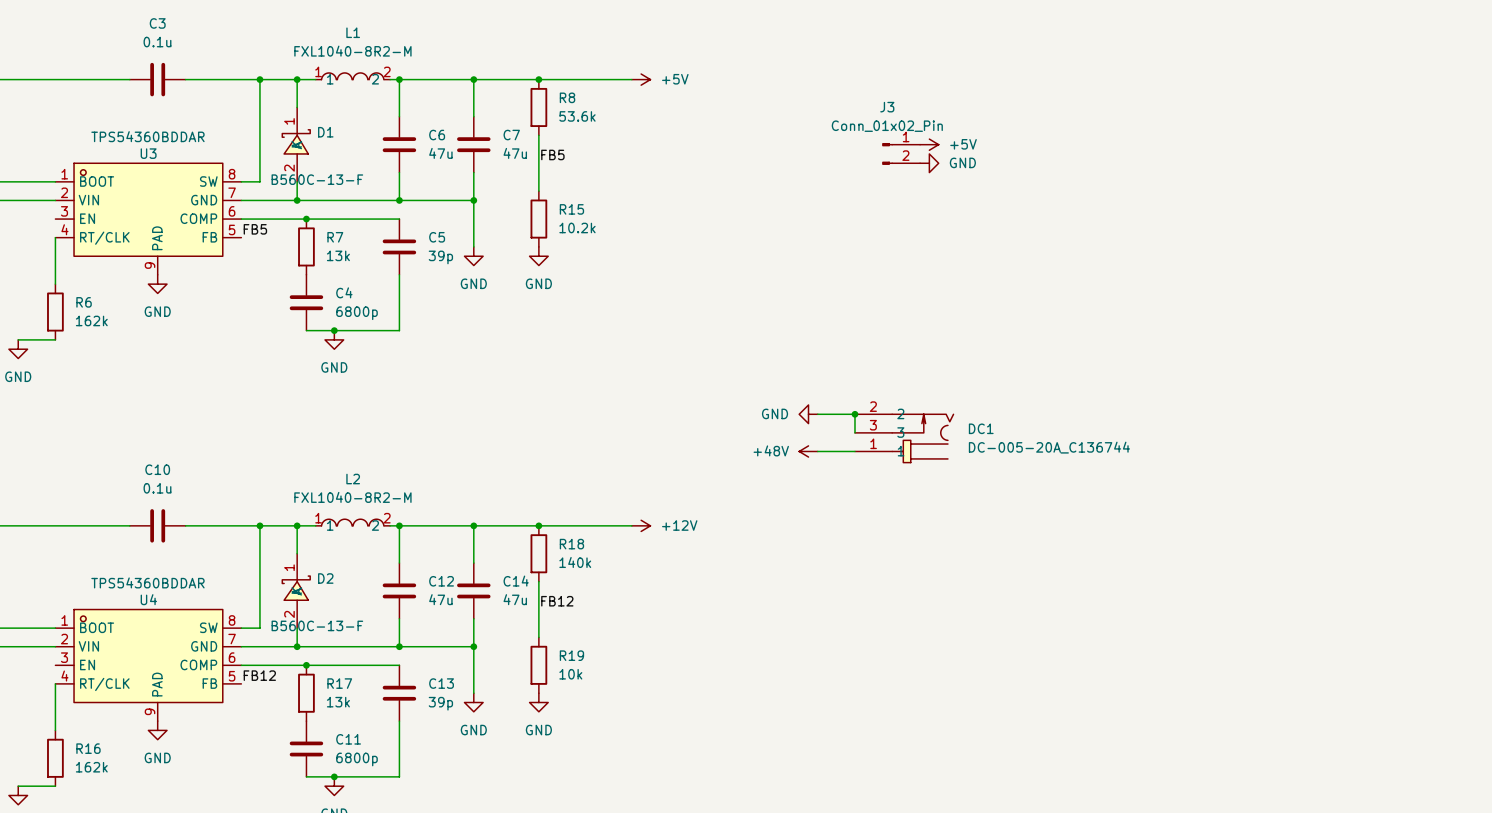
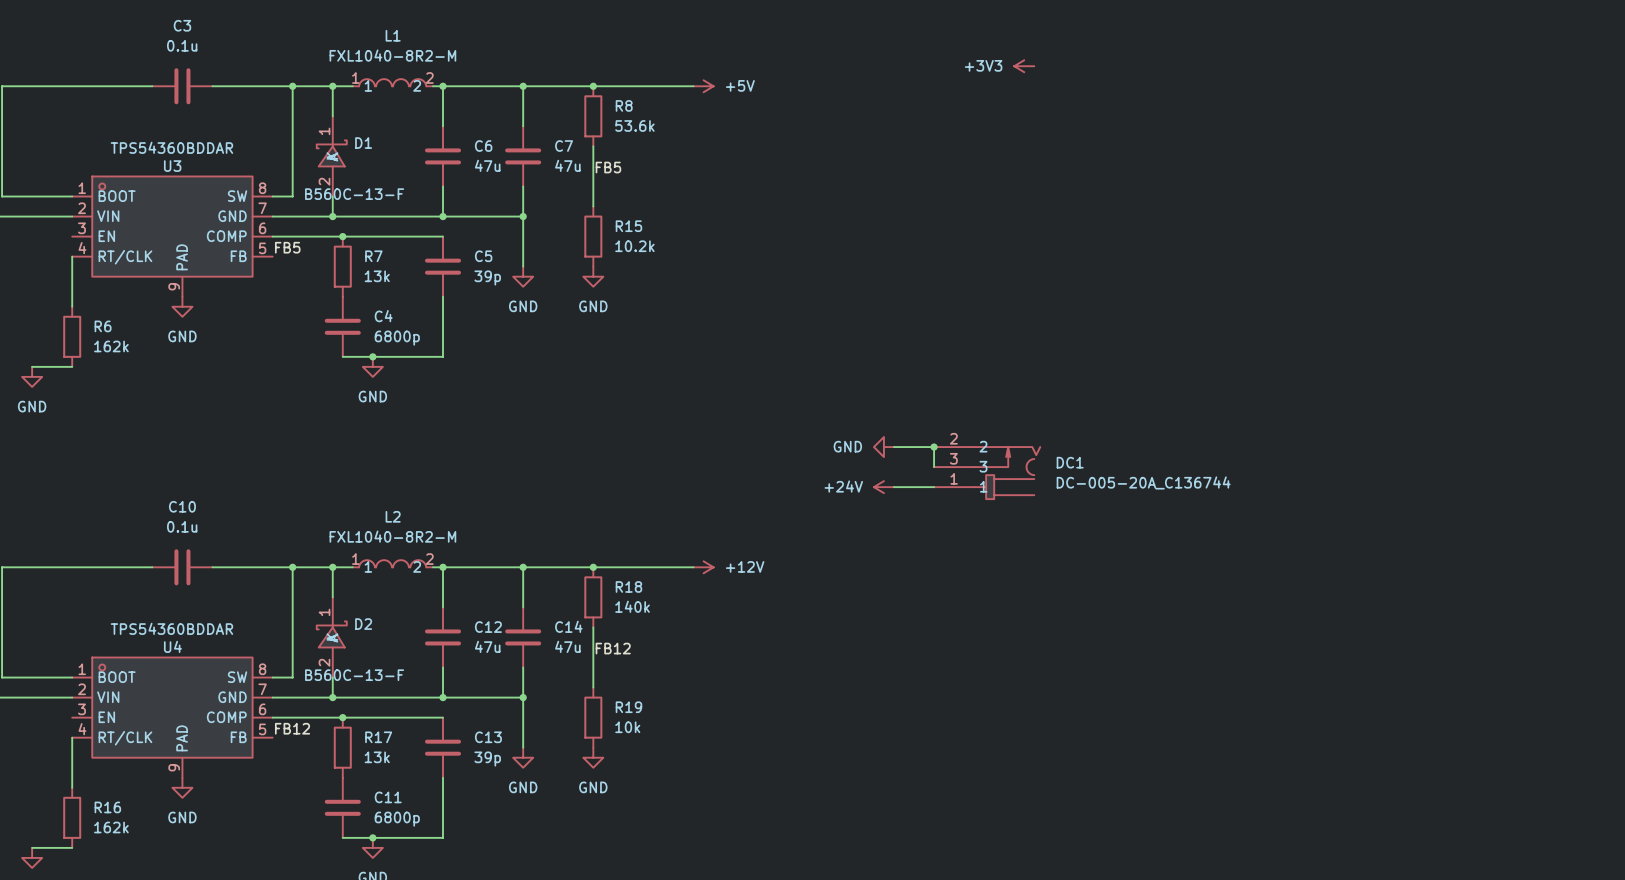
power symbol: none -> +3V3 (1024, 66)
power symbol: +5V (929, 144) -> none
J3: Conn_01x02_Pin (901, 153) -> none
power symbol: GND (929, 163) -> none
power symbol: +48V (808, 451) -> +24V (883, 487)

